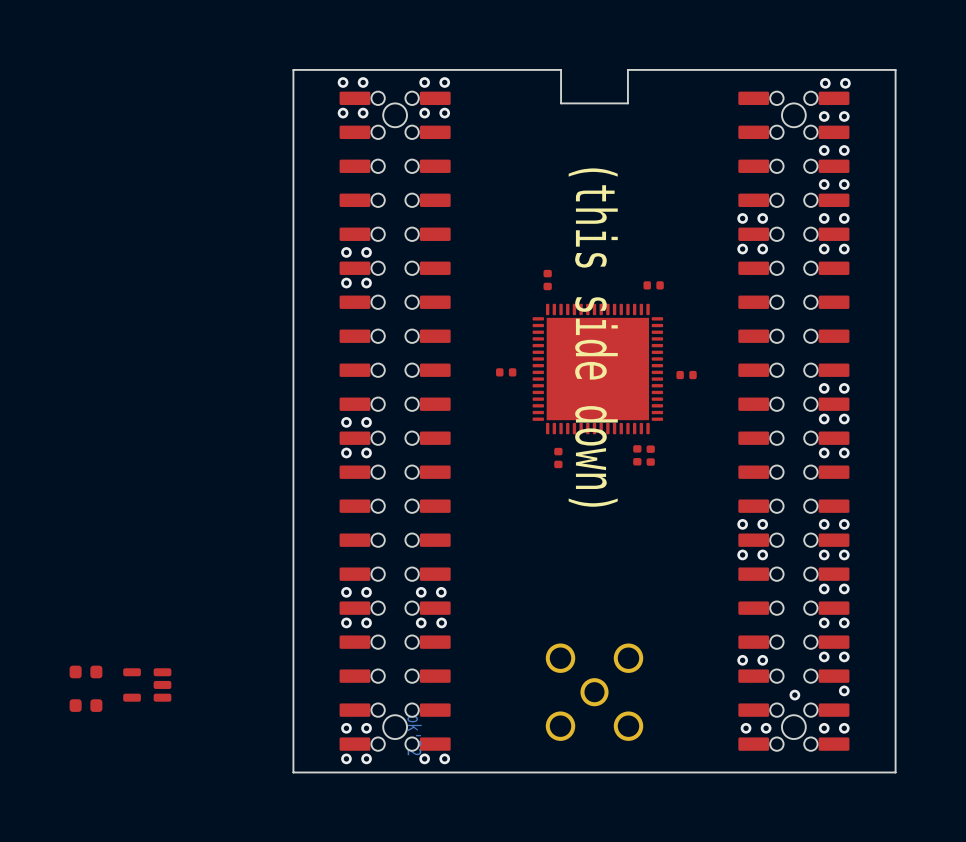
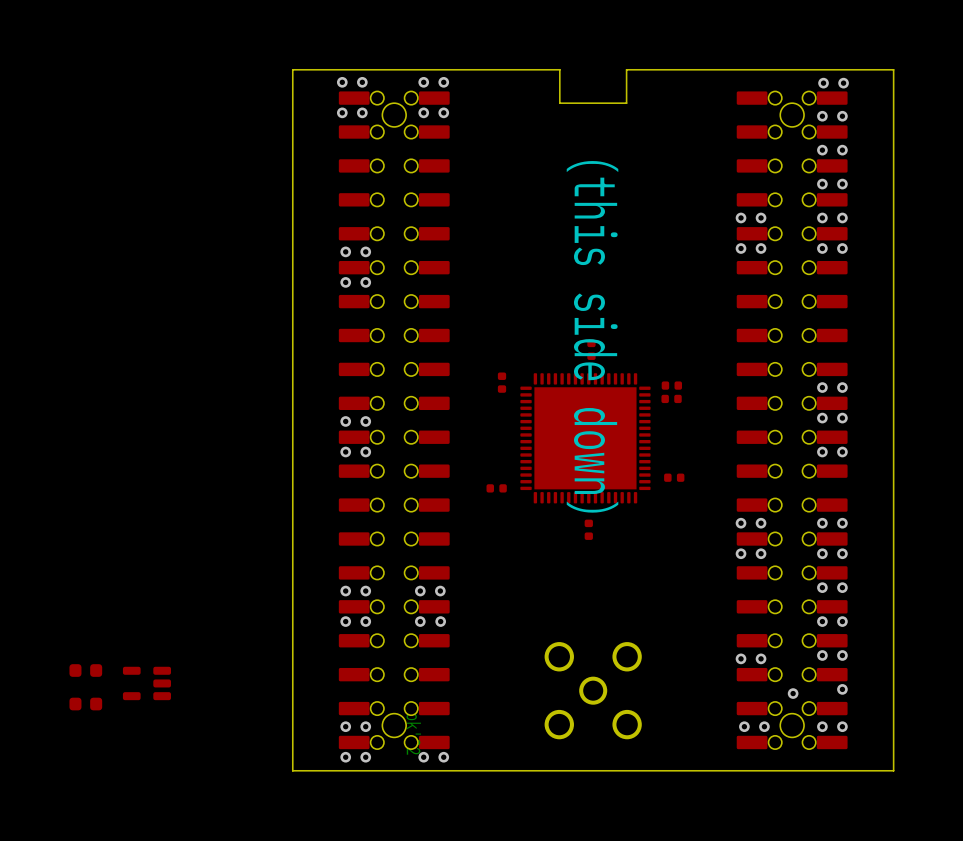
part: (547, 280) -> none
part: (653, 285) -> none
part: none -> (591, 349)
part position: (597, 369) -> (585, 438)
part rotation: 0° (506, 372) -> 90° clockwise (502, 382)
part: (686, 375) -> none
part: none -> (671, 385)
part: none -> (671, 398)
part: (637, 455) -> none
part: (650, 455) -> none
part: (558, 458) -> none
part: none -> (674, 477)
part: none -> (496, 488)
part: none -> (588, 529)

